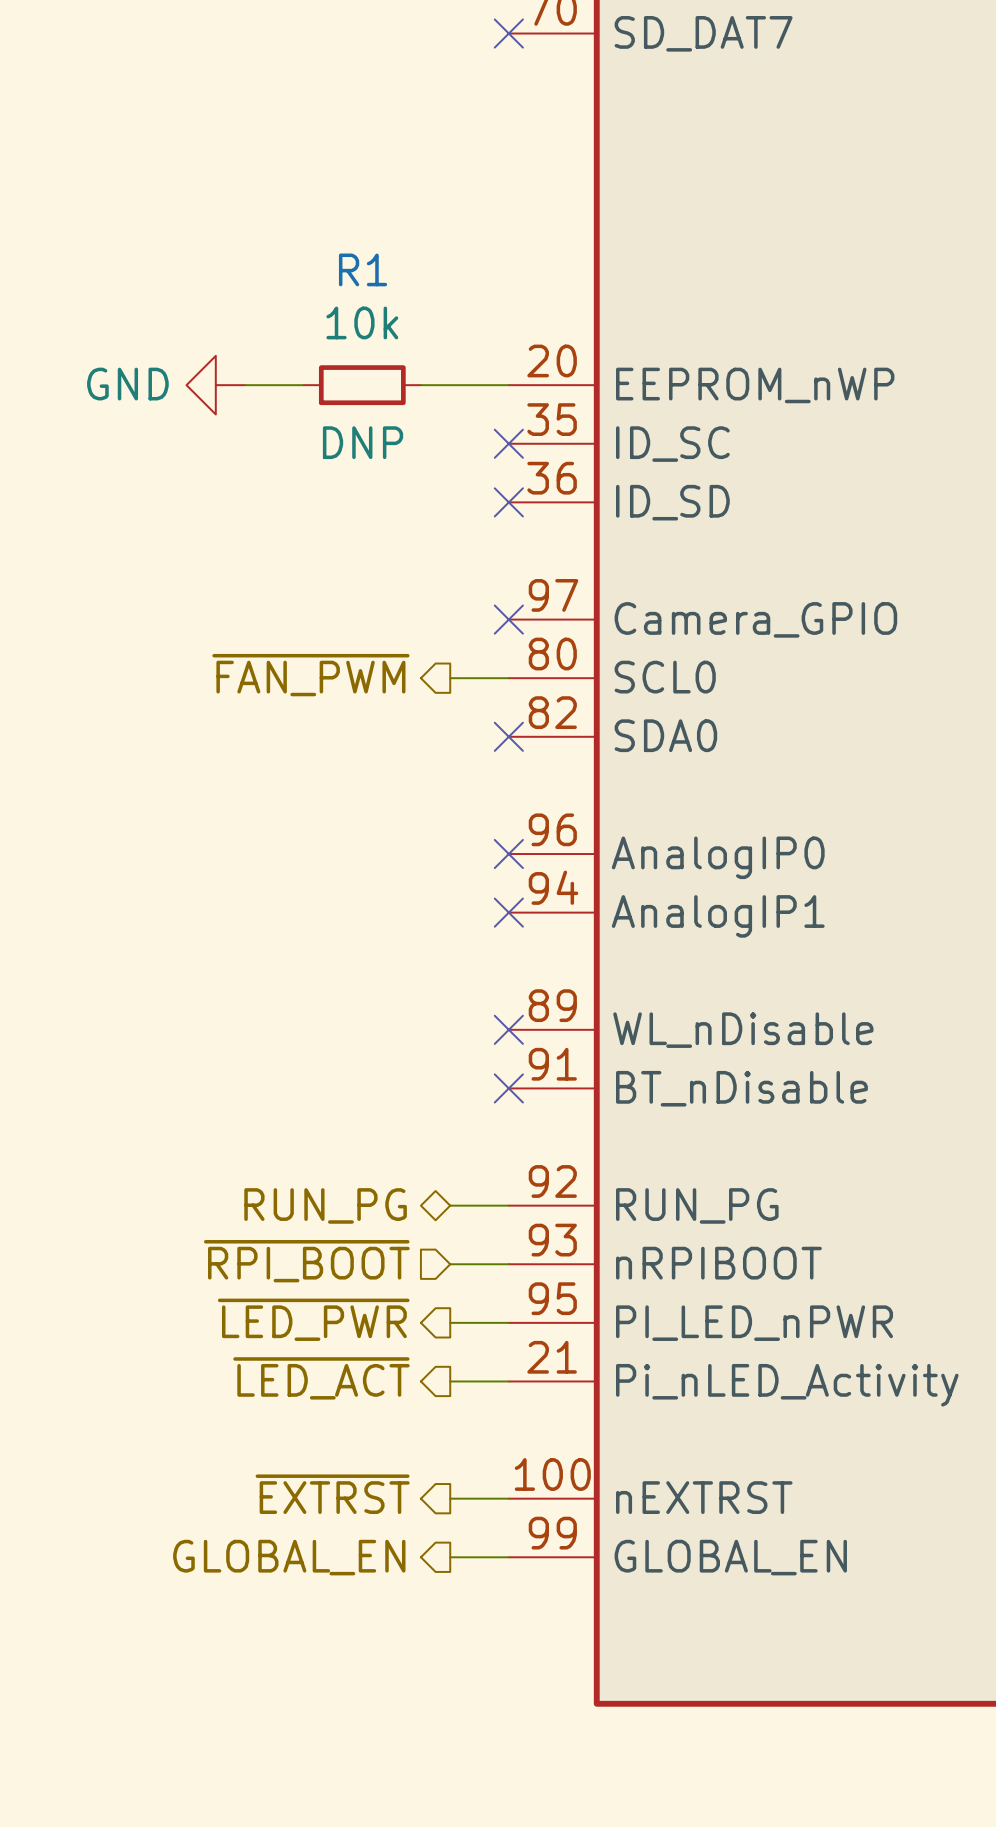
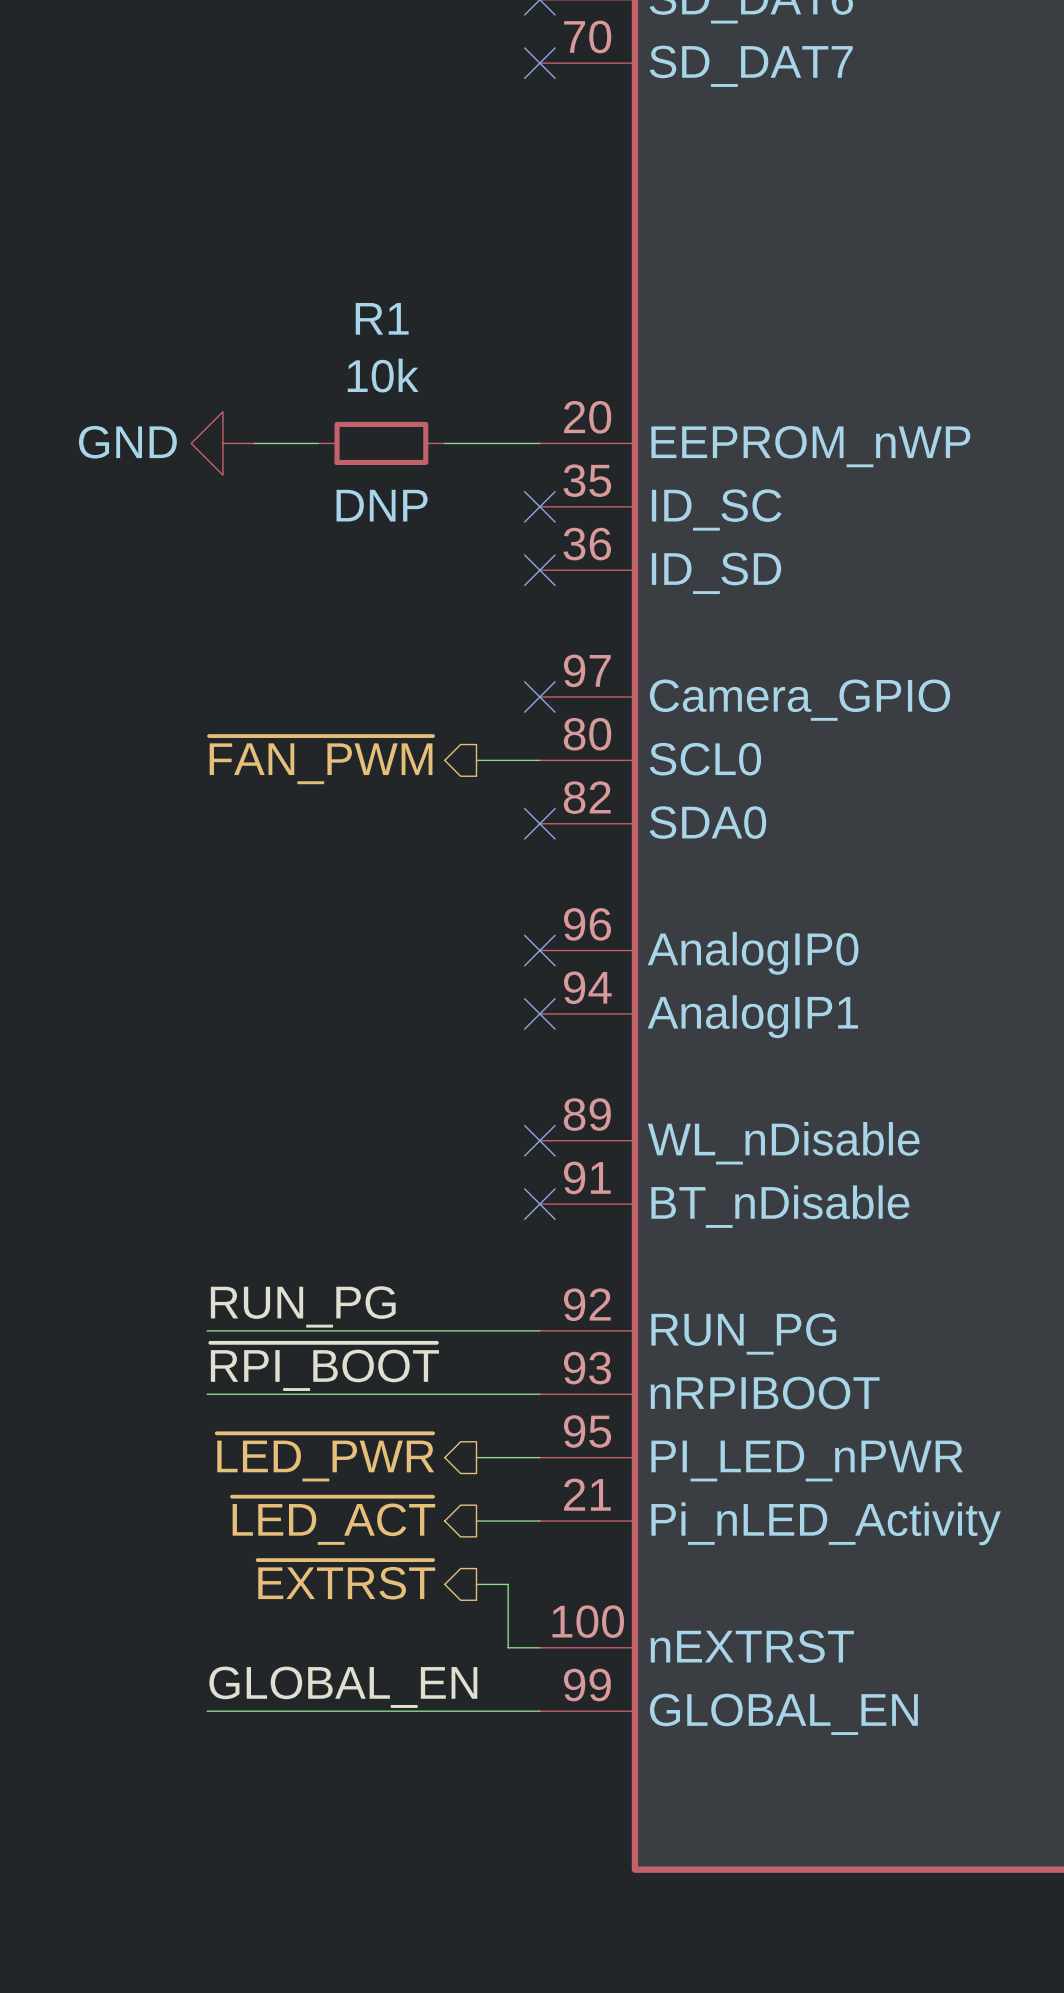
label: none -> RUN_PG (303, 1306)
wire: none -> (207, 1330) (476, 1330)
hierarchical label: RUN_PG (325, 1205) -> none
label: none -> ~{RPI_BOOT} (324, 1366)
hierarchical label: ~{RPI_BOOT} (306, 1261) -> none
wire: none -> (207, 1394) (476, 1394)
hierarchical label position: ~{EXTRST} (332, 1494) -> ~{EXTRST} (346, 1579)
wire: (450, 1498) (479, 1498) -> (476, 1584) (508, 1584) (508, 1647)
label: none -> GLOBAL_EN (343, 1687)
wire: none -> (207, 1711) (476, 1711)
hierarchical label: GLOBAL_EN (289, 1557) -> none

